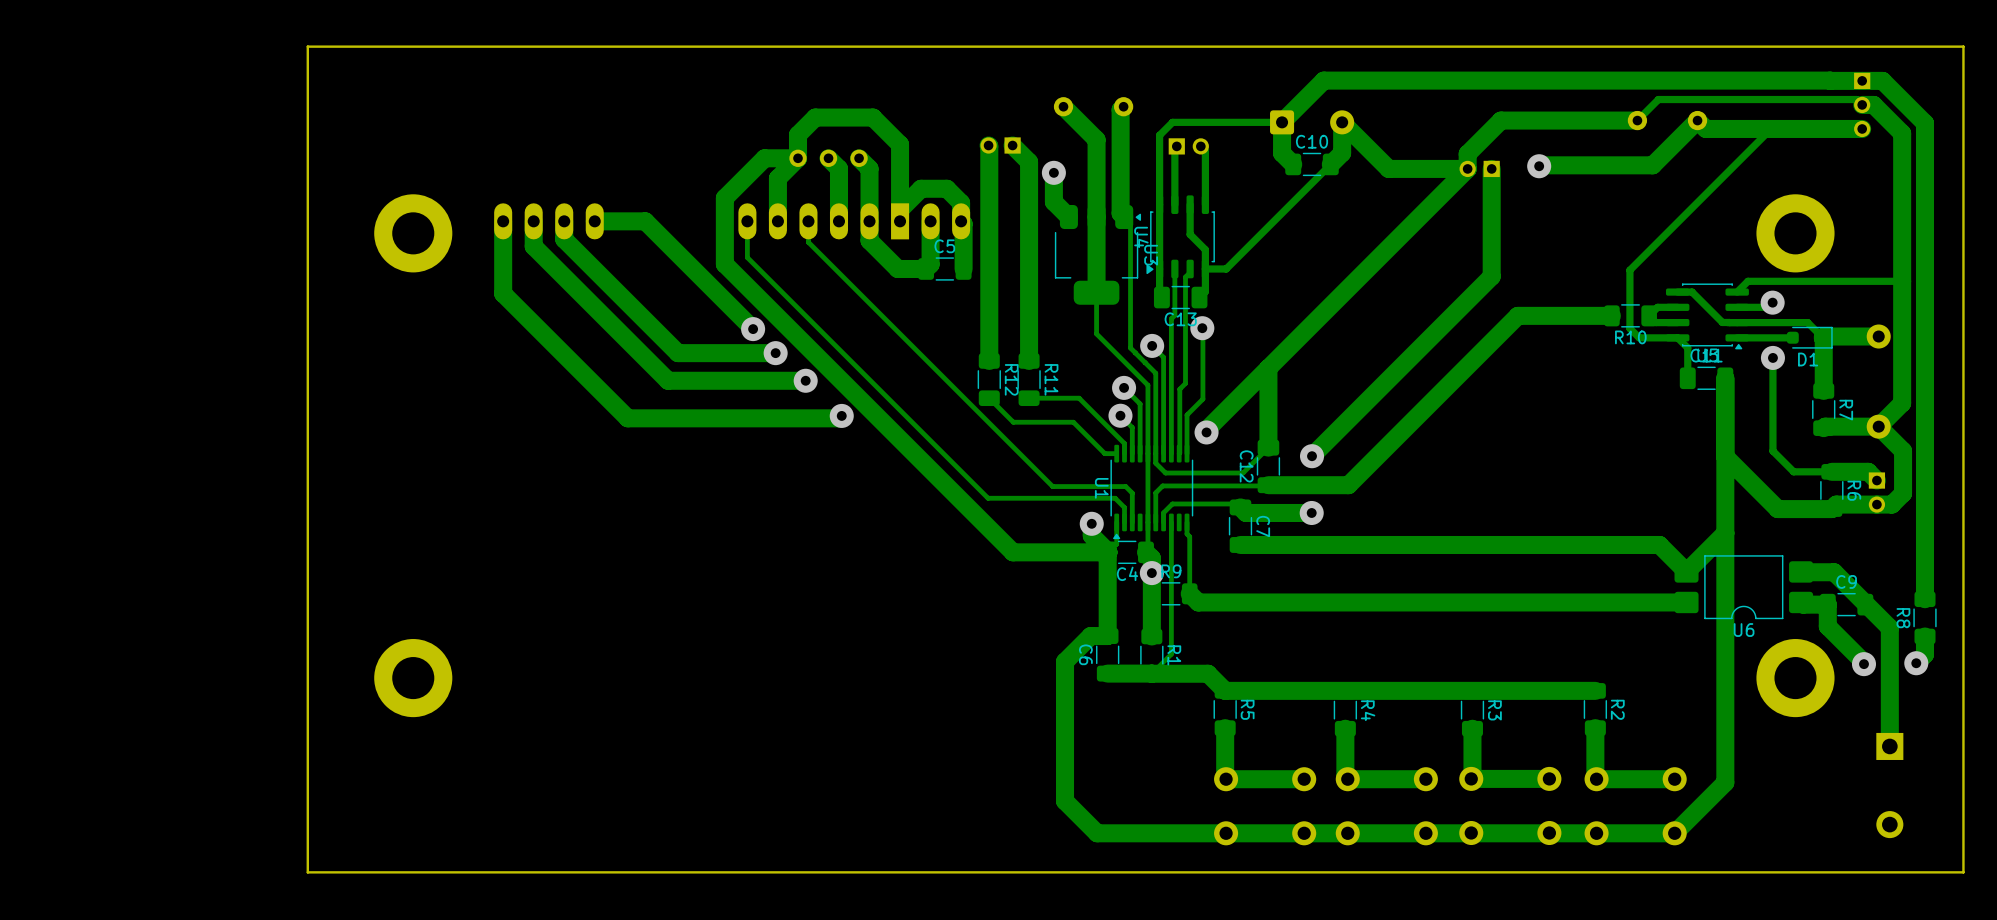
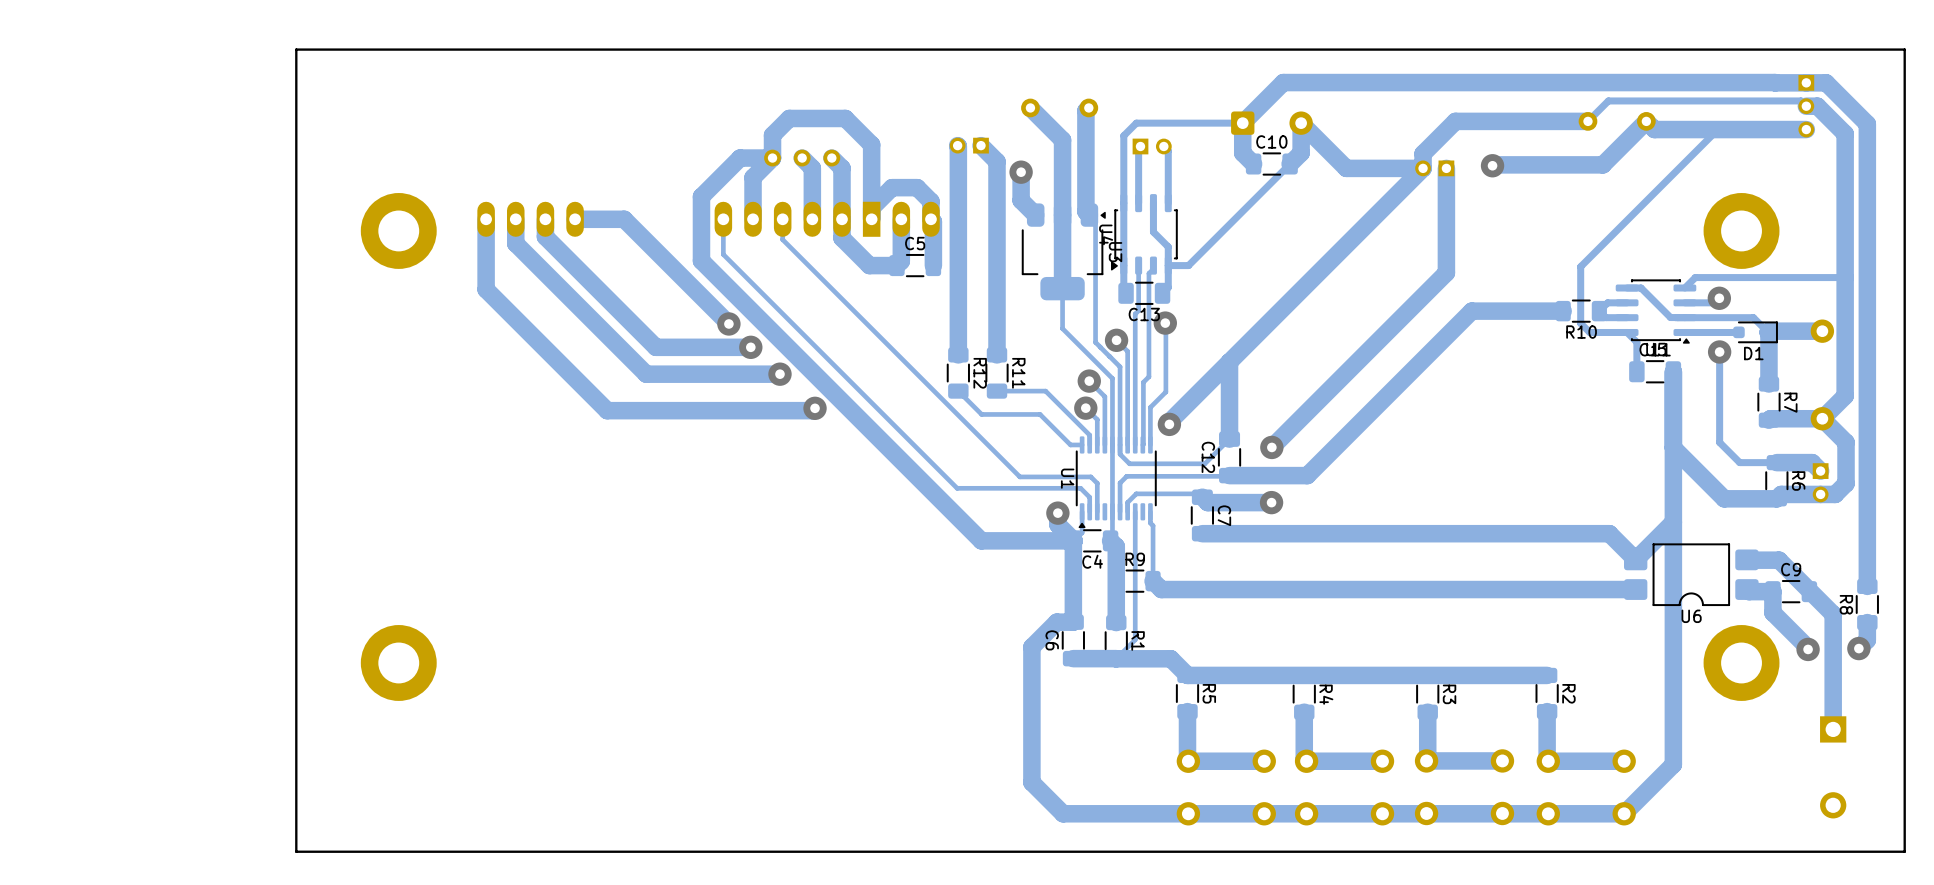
via: (1151, 573) -> none

